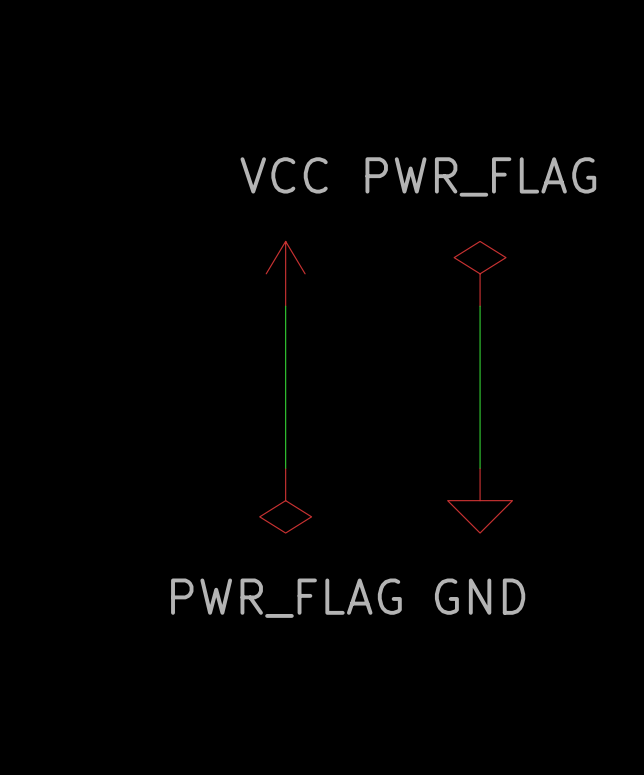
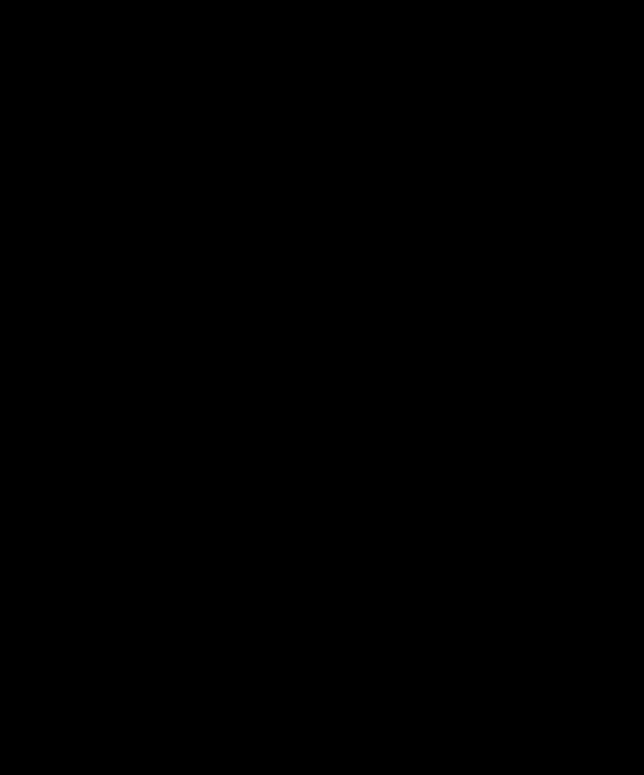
power symbol: VCC (285, 273) -> none
power symbol: PWR_FLAG (480, 273) -> none
wire: (285, 306) (285, 468) -> none
wire: (480, 306) (480, 468) -> none
power symbol: PWR_FLAG (285, 500) -> none
power symbol: GND (480, 500) -> none

